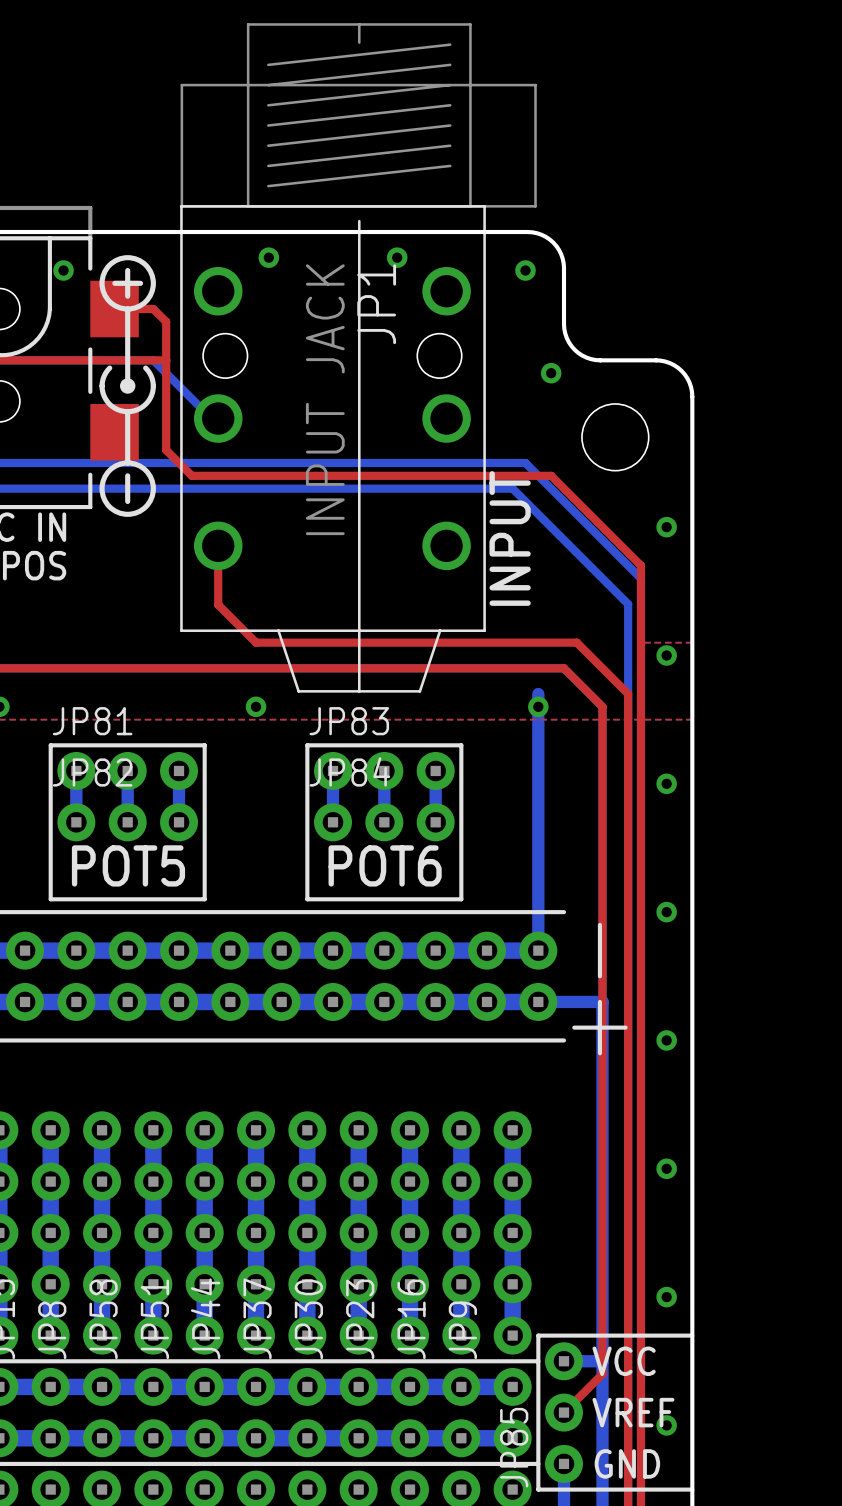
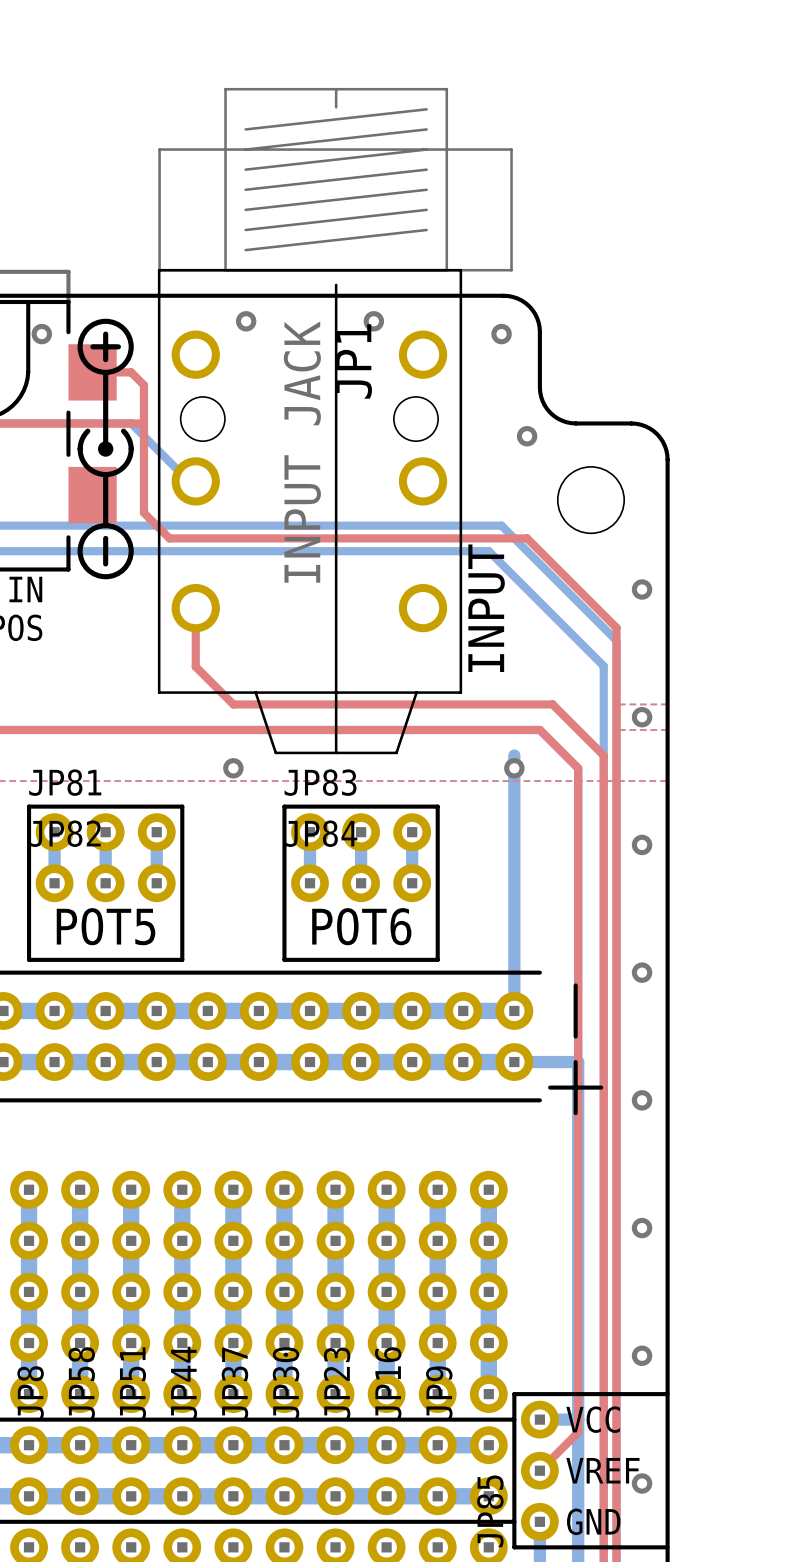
top zone outline: none -> (616, 729) (667, 729)

